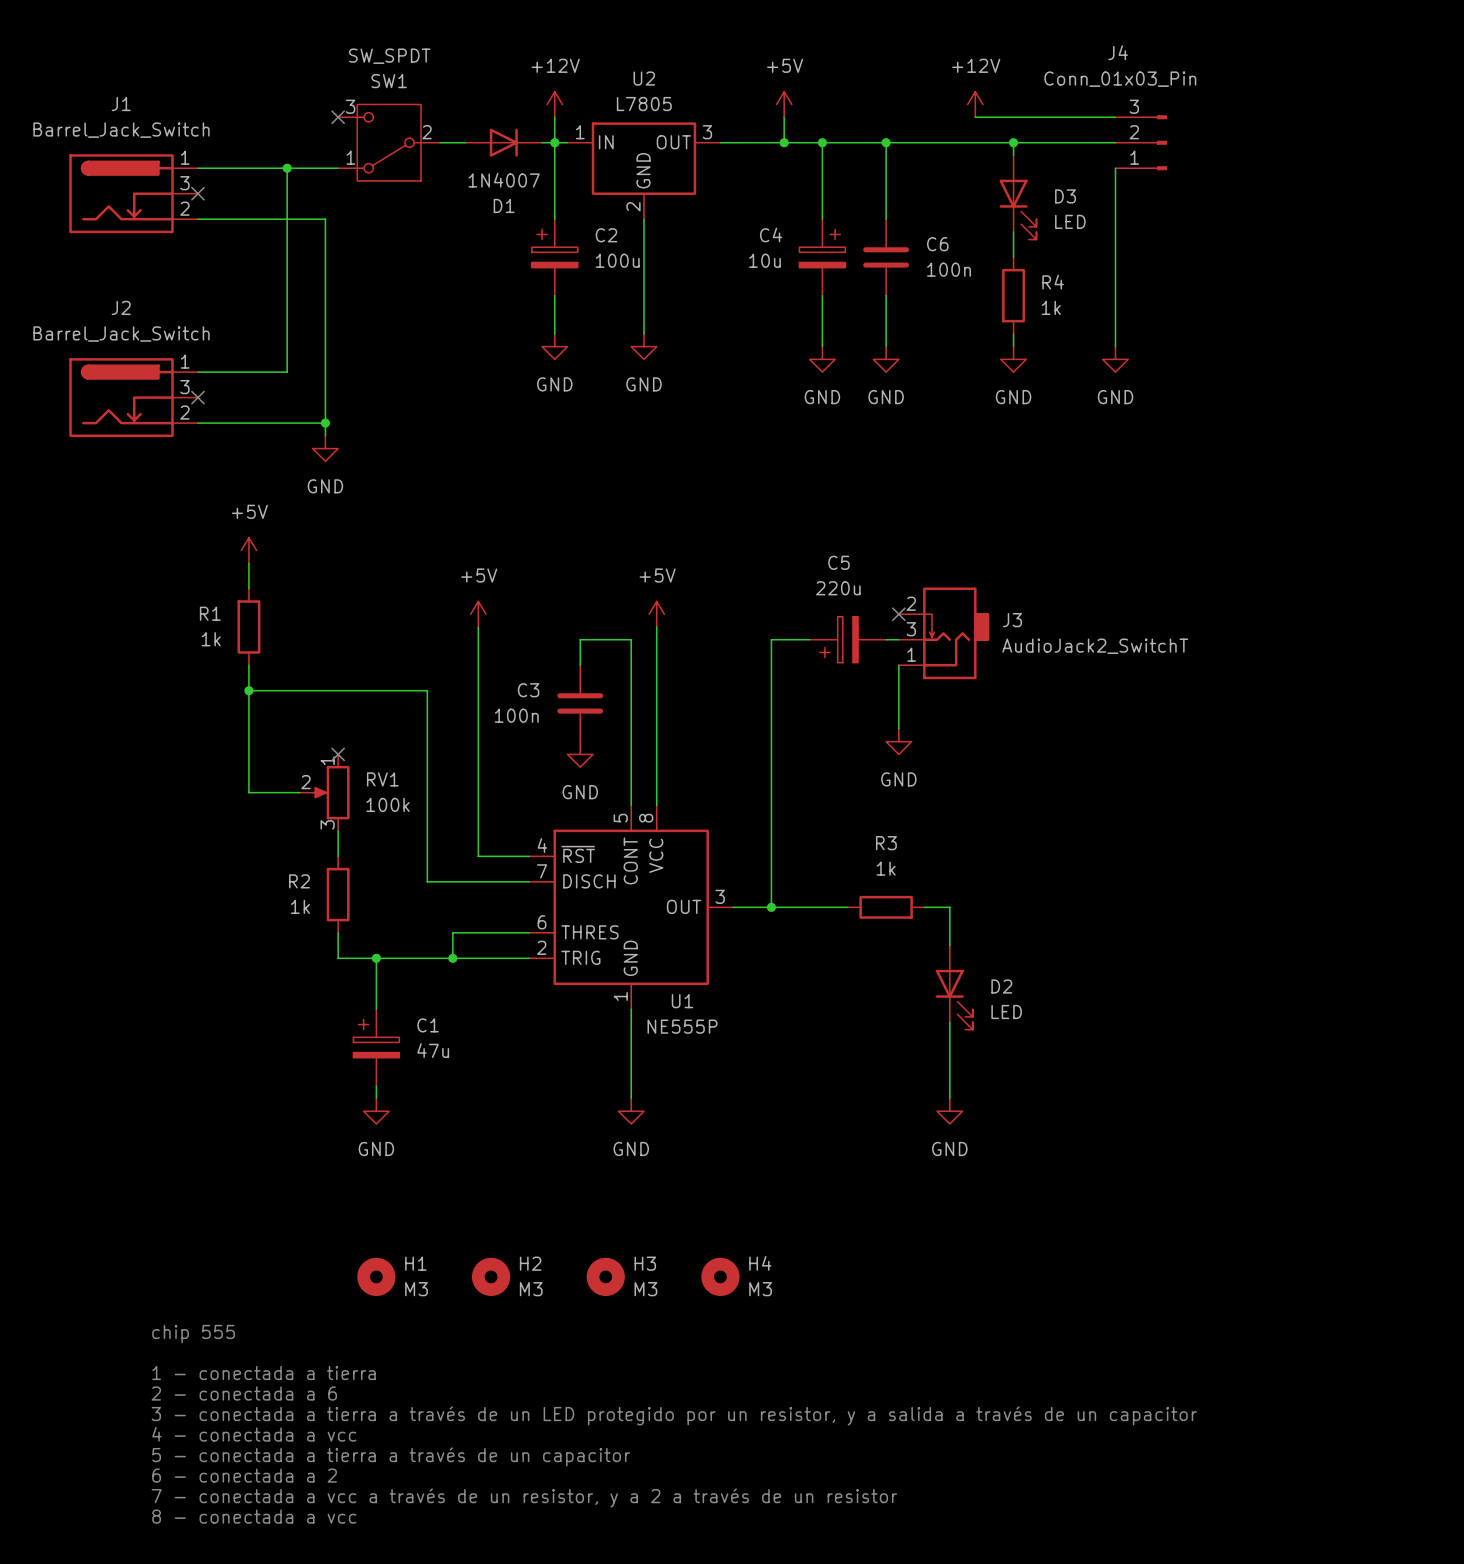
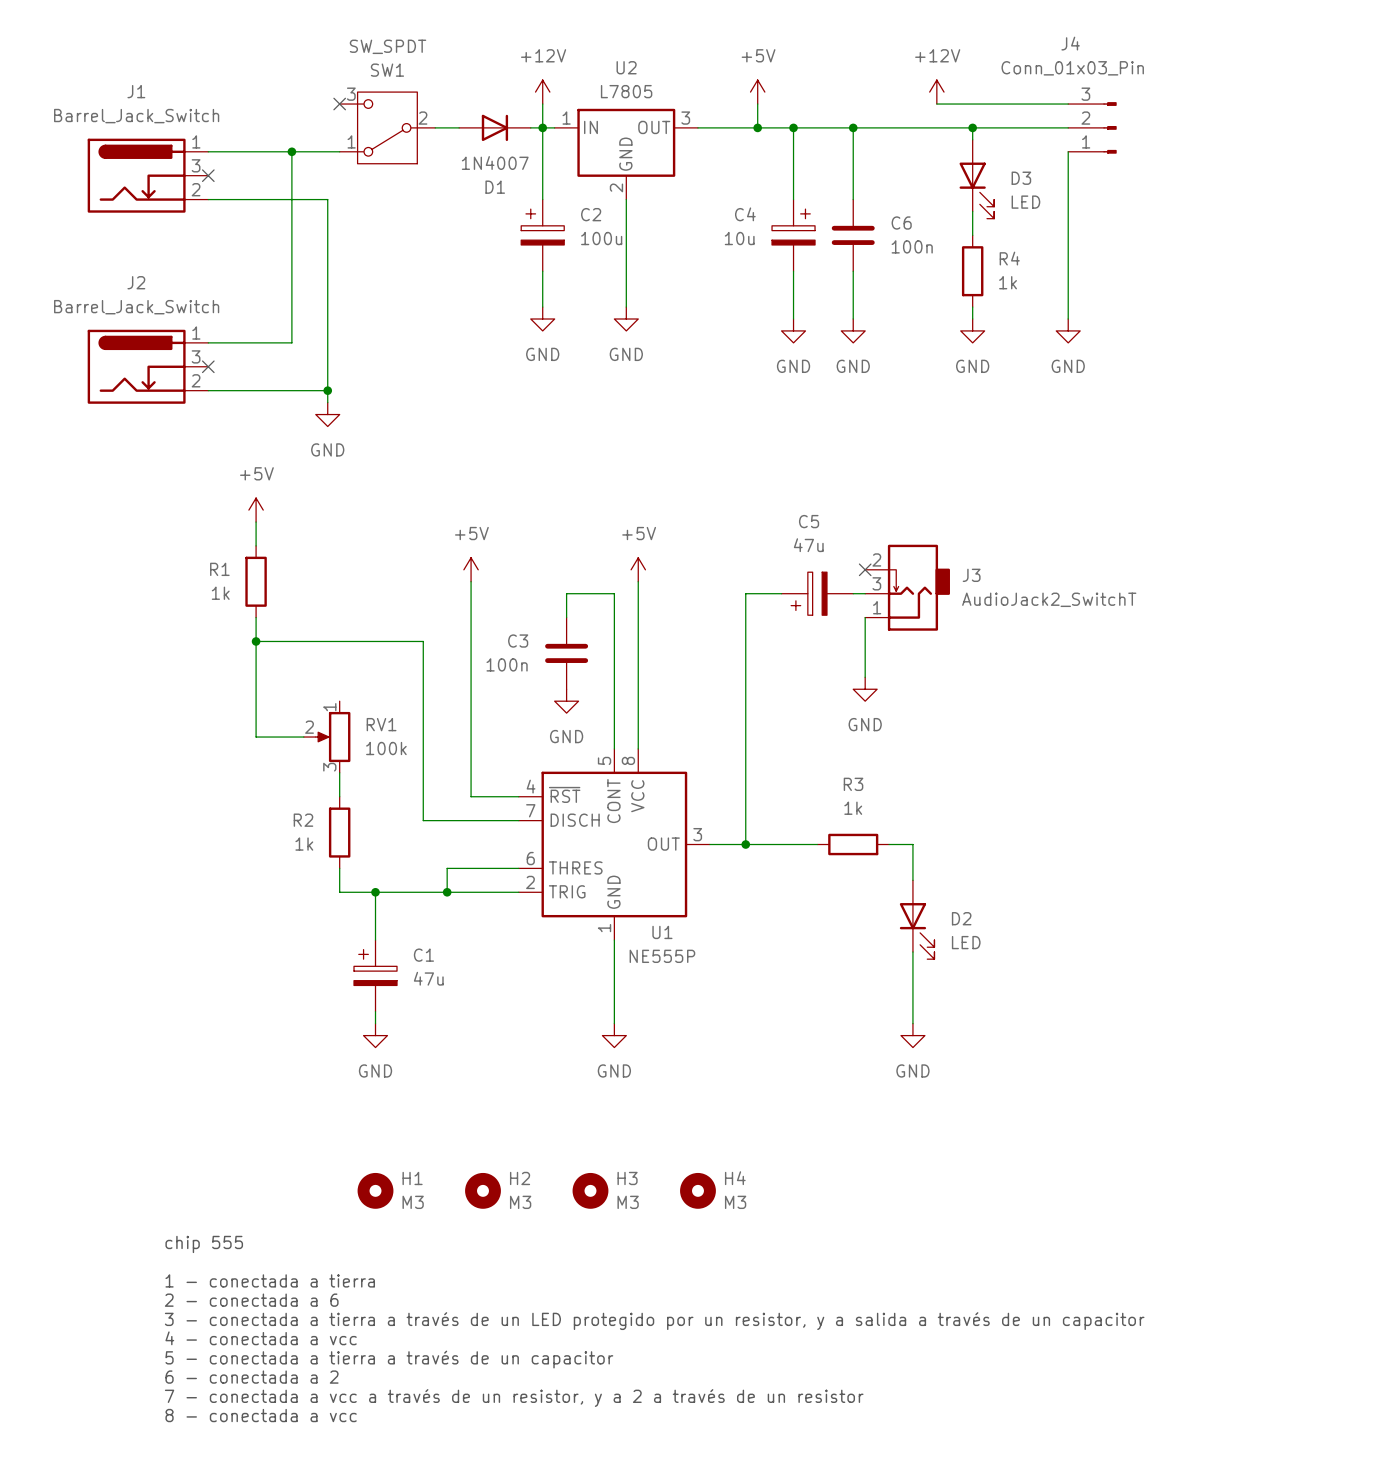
C5 value: 220u (838, 588) -> 47u (808, 545)
no-connect mark: (338, 754) -> none

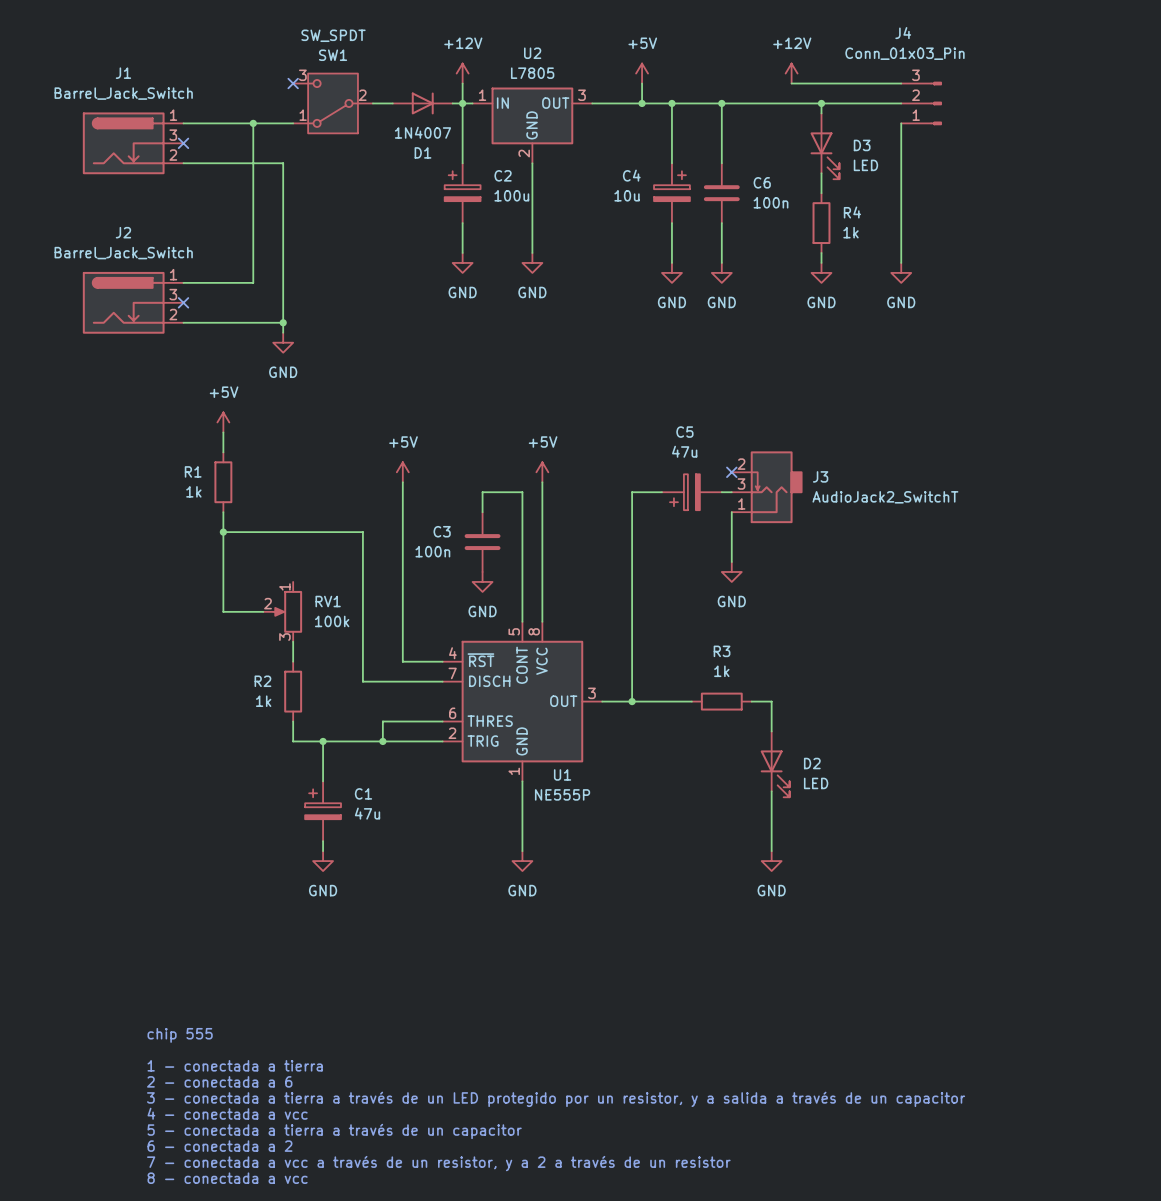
H1: M3 (375, 1190) -> none
H2: M3 (483, 1190) -> none
H3: M3 (590, 1190) -> none
H4: M3 (697, 1190) -> none

